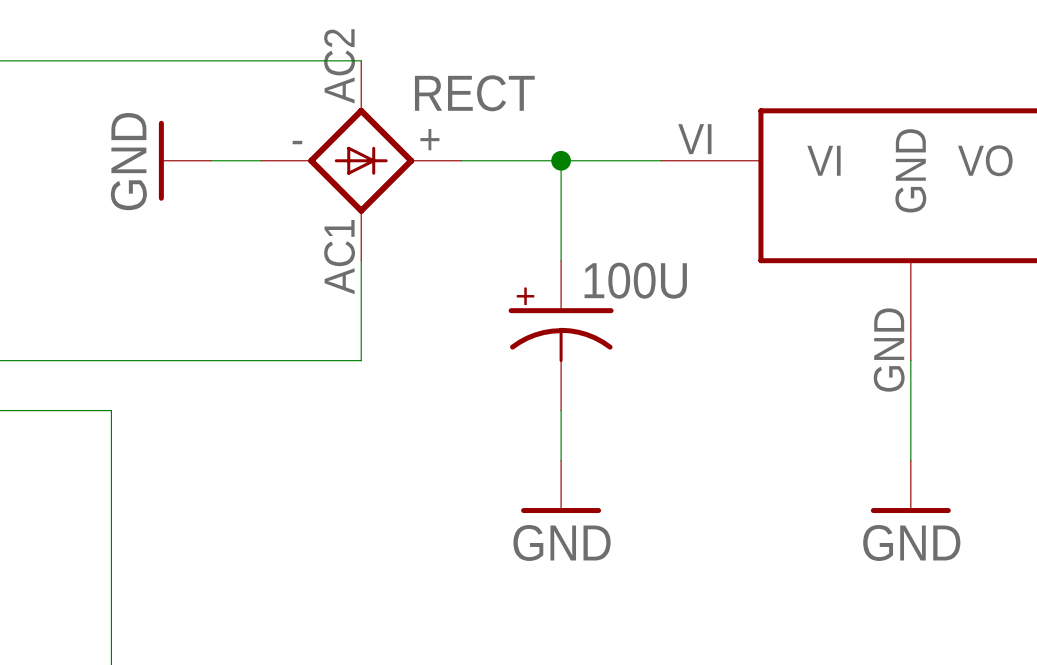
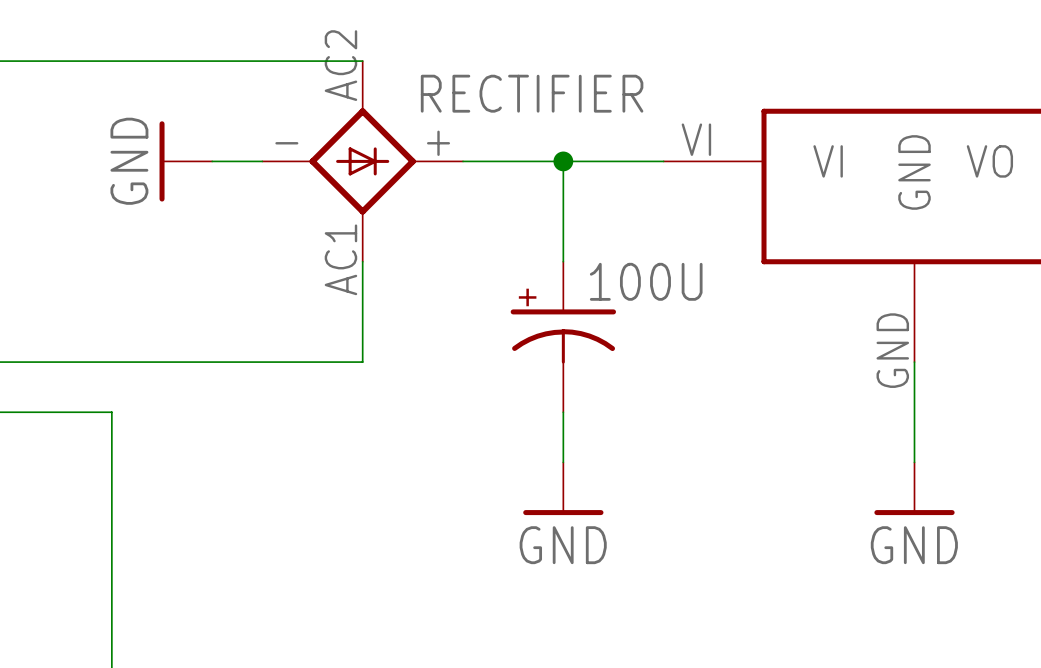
RECT name: RECT (474, 93) -> RECTIFIER (532, 93)

